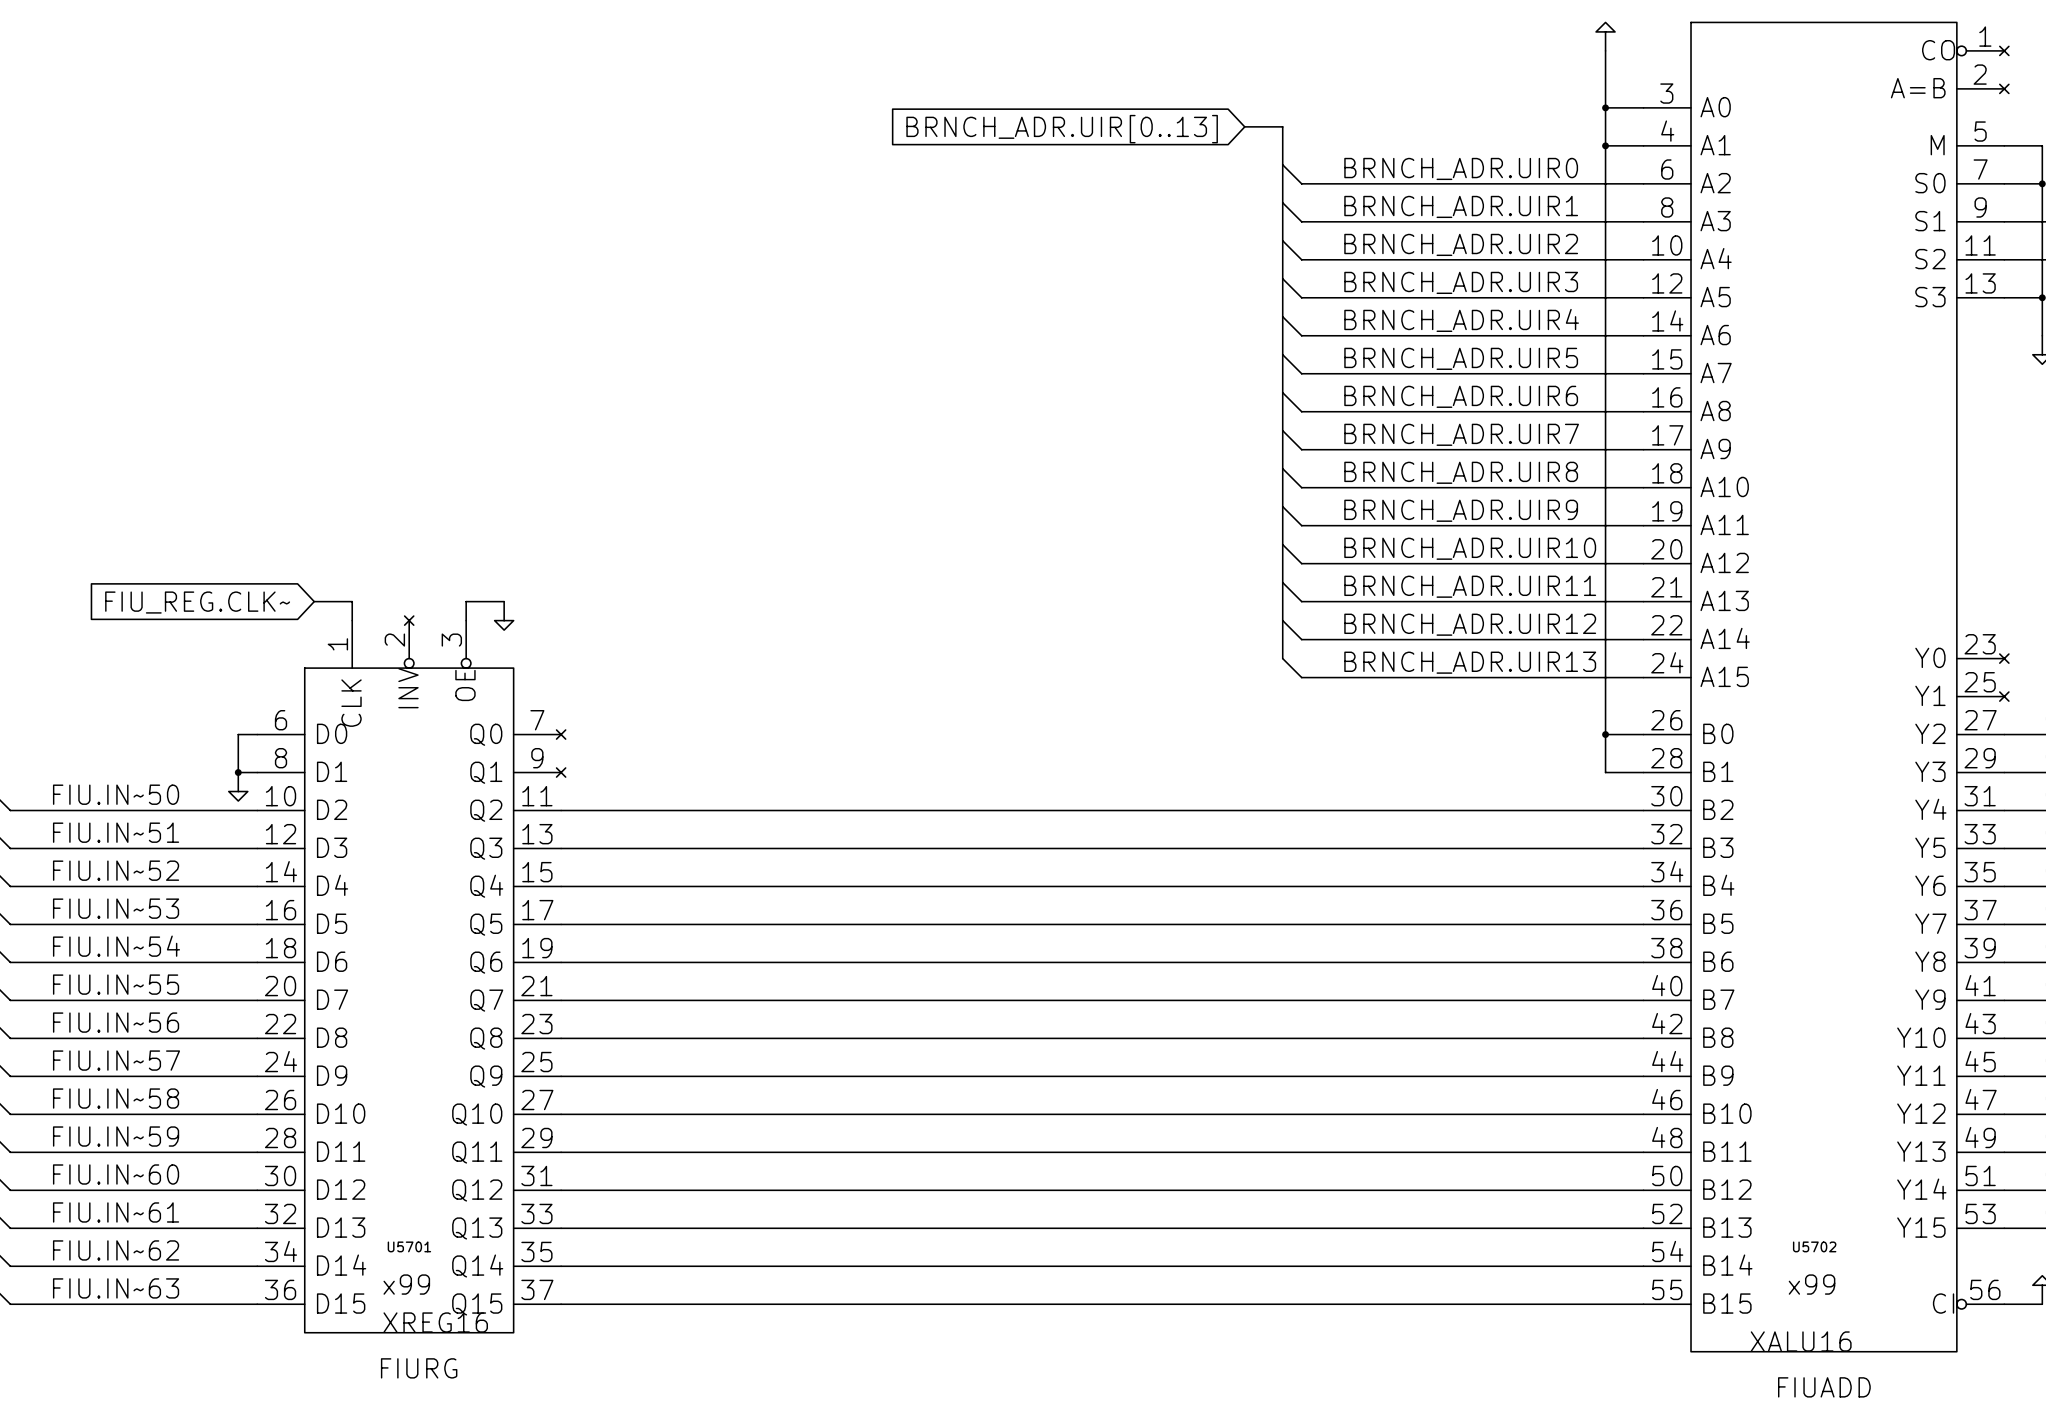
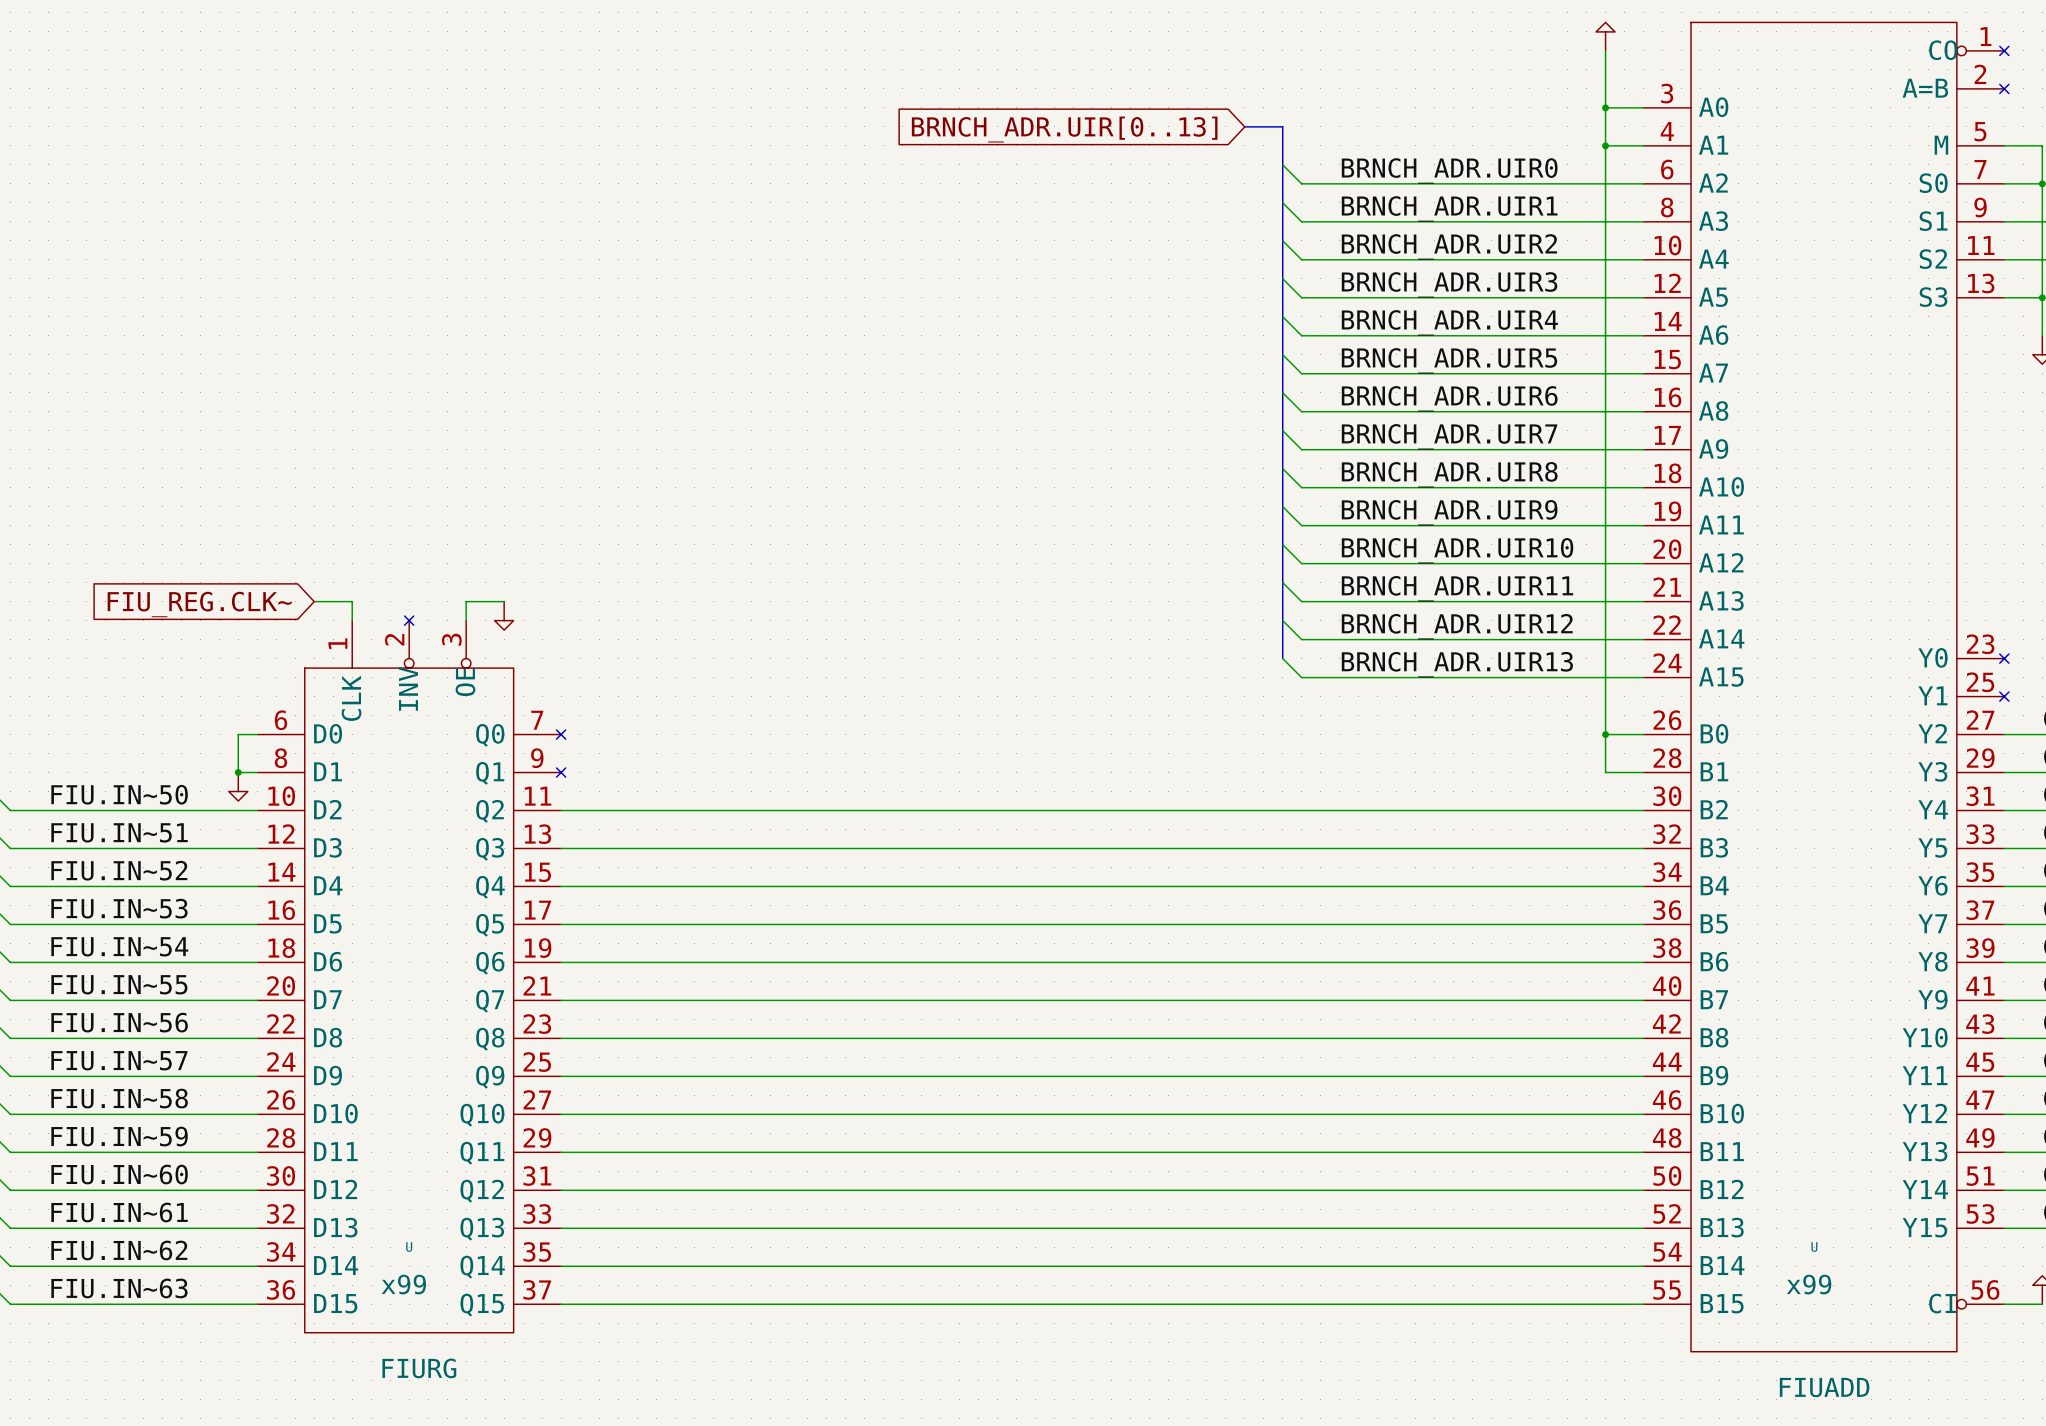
U5701 name: U5701 (409, 1246) -> U (409, 1247)
U5702 name: U5702 (1814, 1246) -> U (1814, 1247)
U5701 value: XREG16 (435, 1322) -> none
U5702 value: XALU16 (1801, 1341) -> none

